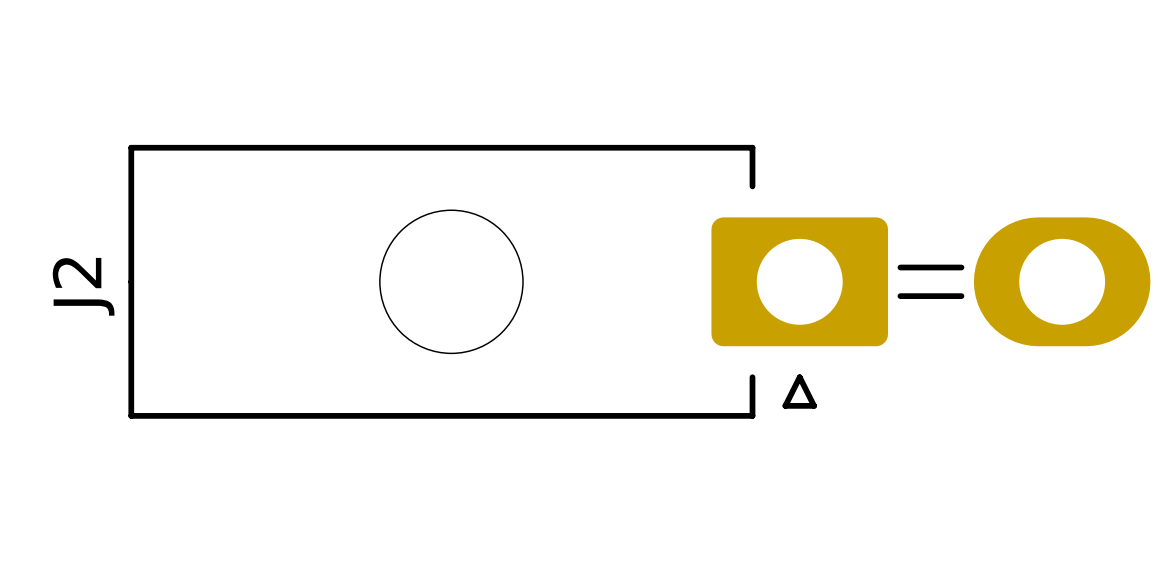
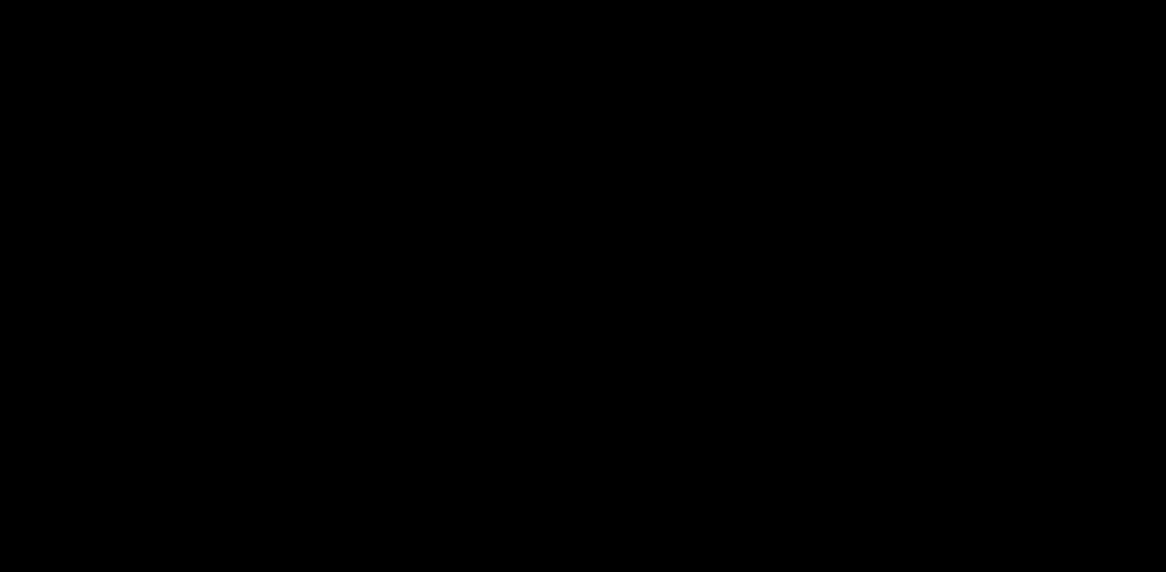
J2: (639, 281) -> none

